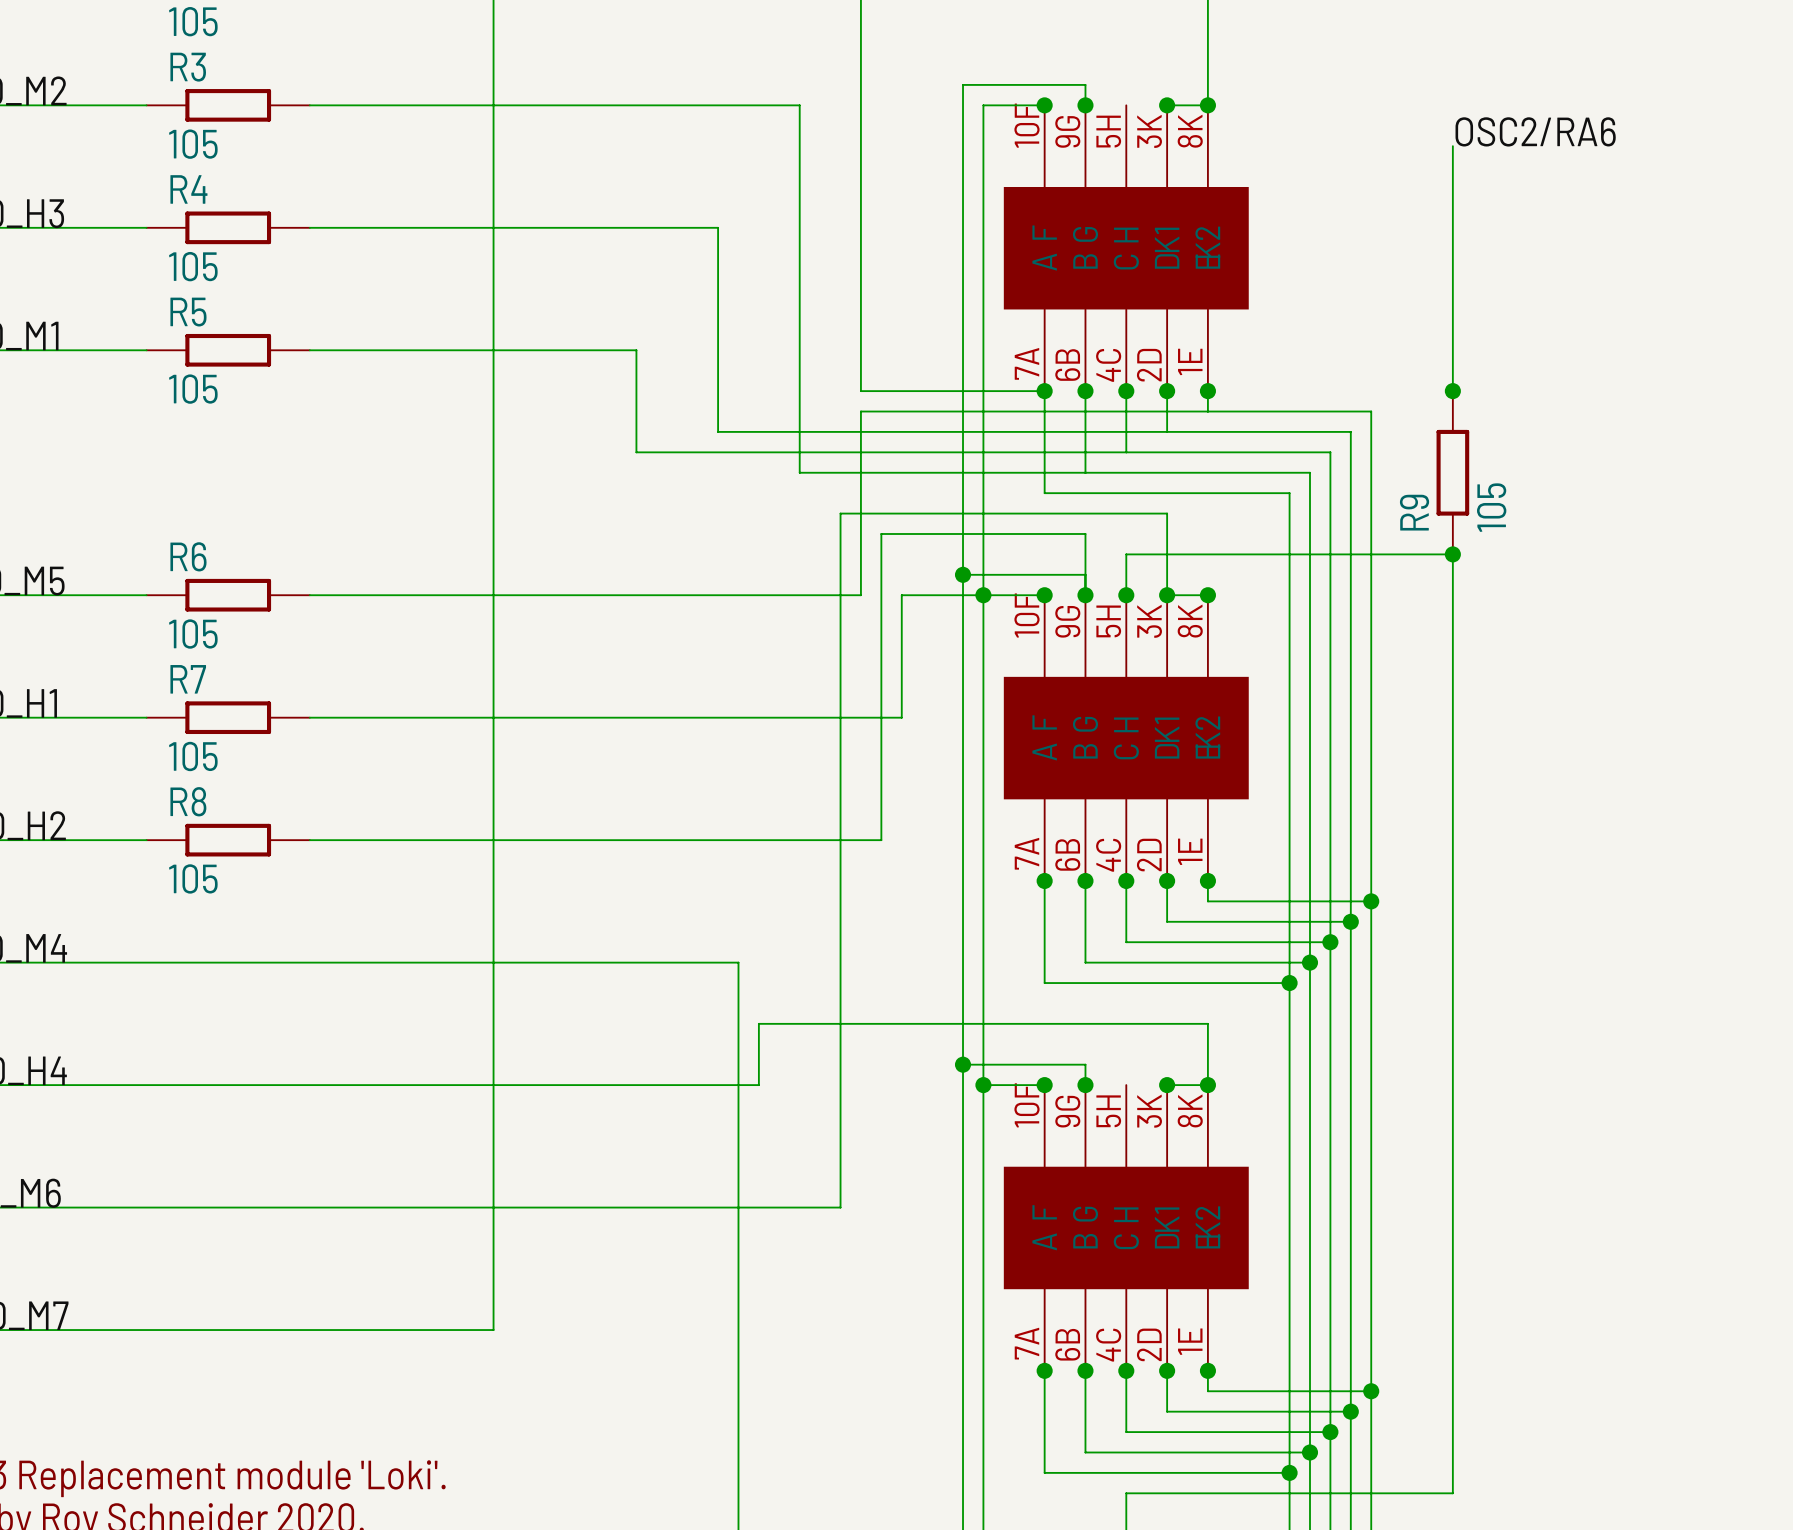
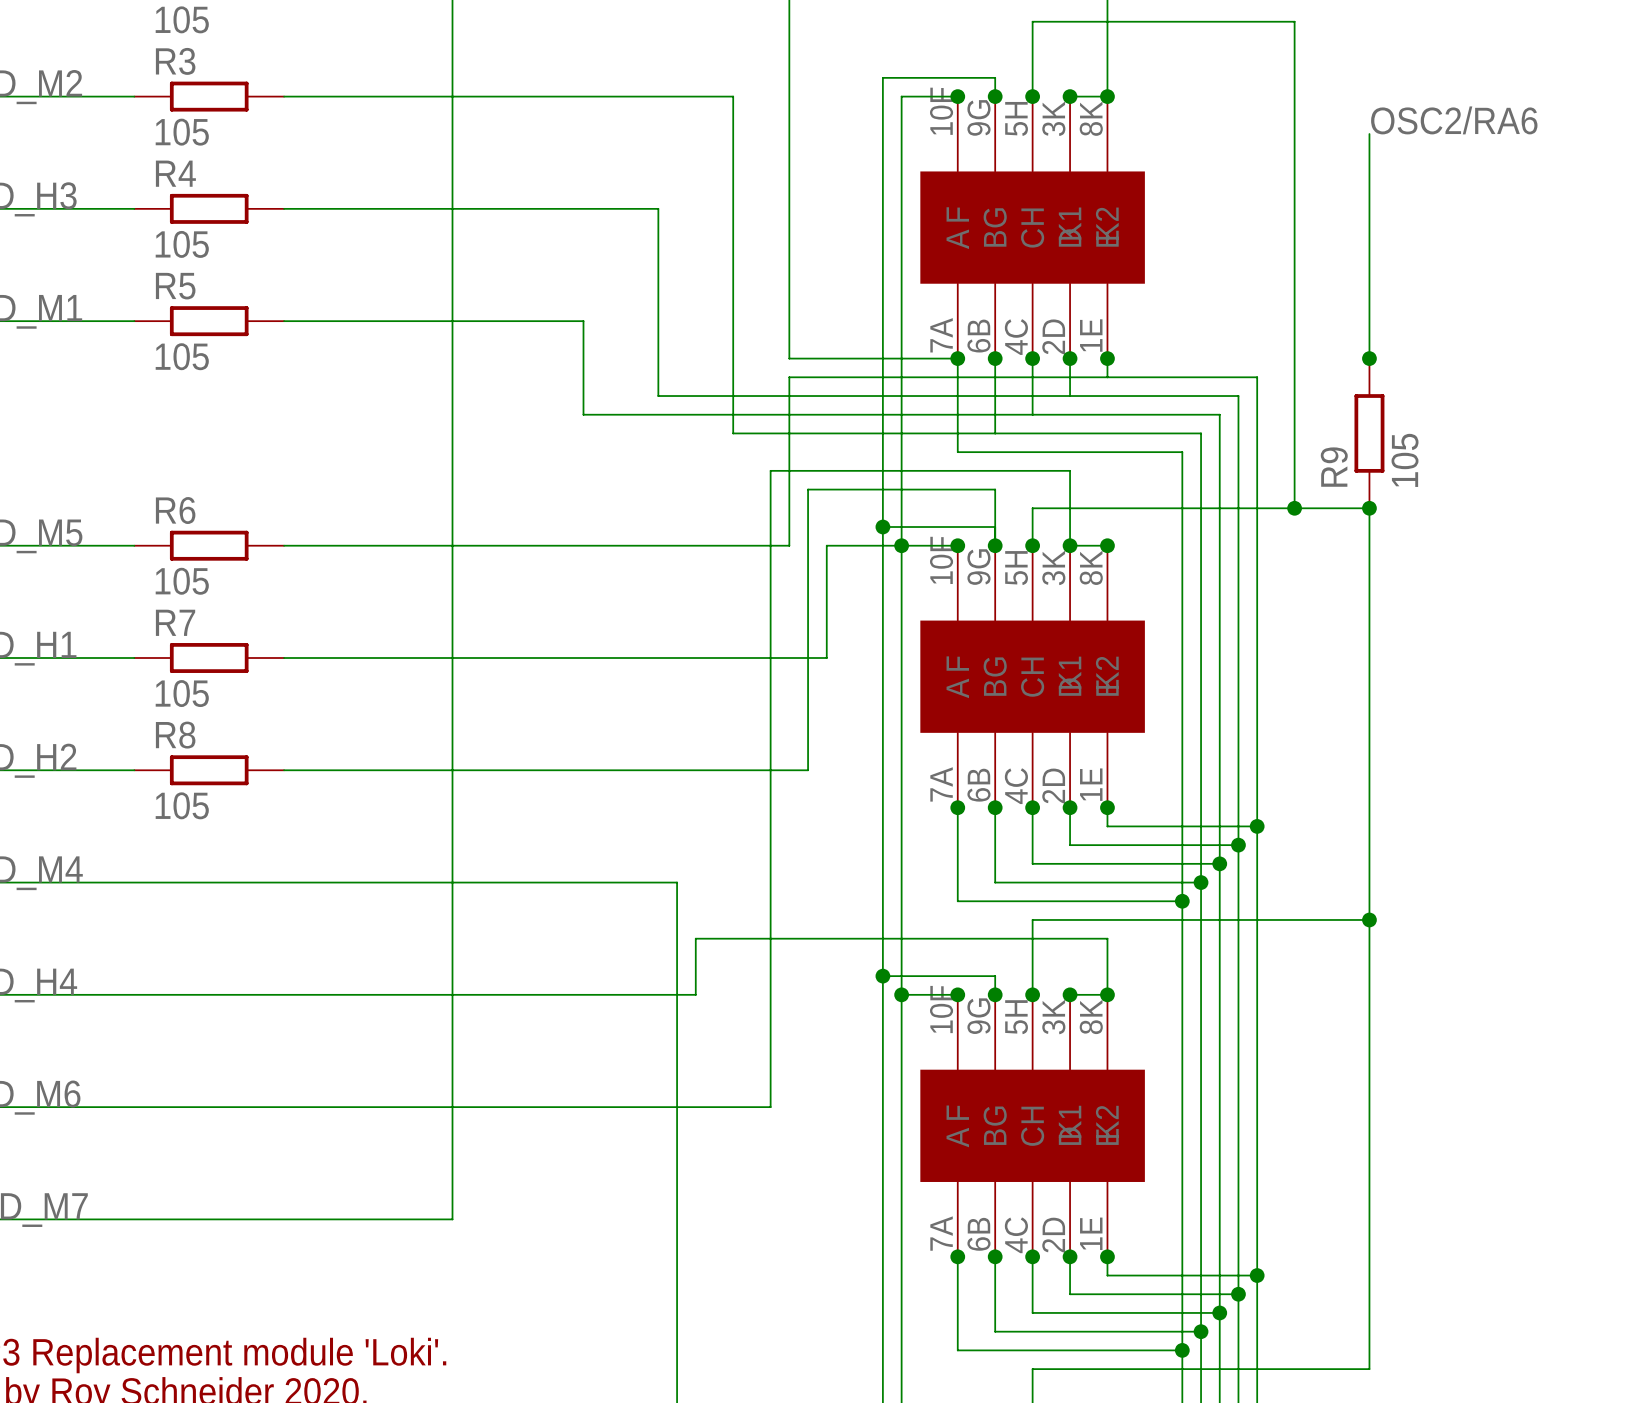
wire: none -> (1032, 96) (1032, 21) (1294, 21) (1294, 508)
junction: none -> (1032, 96)
label position: OSC2/RA6 (1535, 131) -> OSC2/RA6 (1454, 120)
wire: (1452, 146) (1452, 391) -> (1369, 134) (1369, 358)
junction position: (1452, 391) -> (1369, 358)
R9 position: (1452, 472) -> (1369, 433)
junction: none -> (1294, 508)
wire: (1452, 554) (1452, 1493) -> (1332, 508) (1369, 508) (1369, 1369) (1332, 1369)
junction: (1452, 554) -> none
junction: none -> (1369, 508)
wire: none -> (1369, 919) (1032, 919) (1032, 994)
junction: none -> (1369, 919)
junction: none -> (1032, 994)

